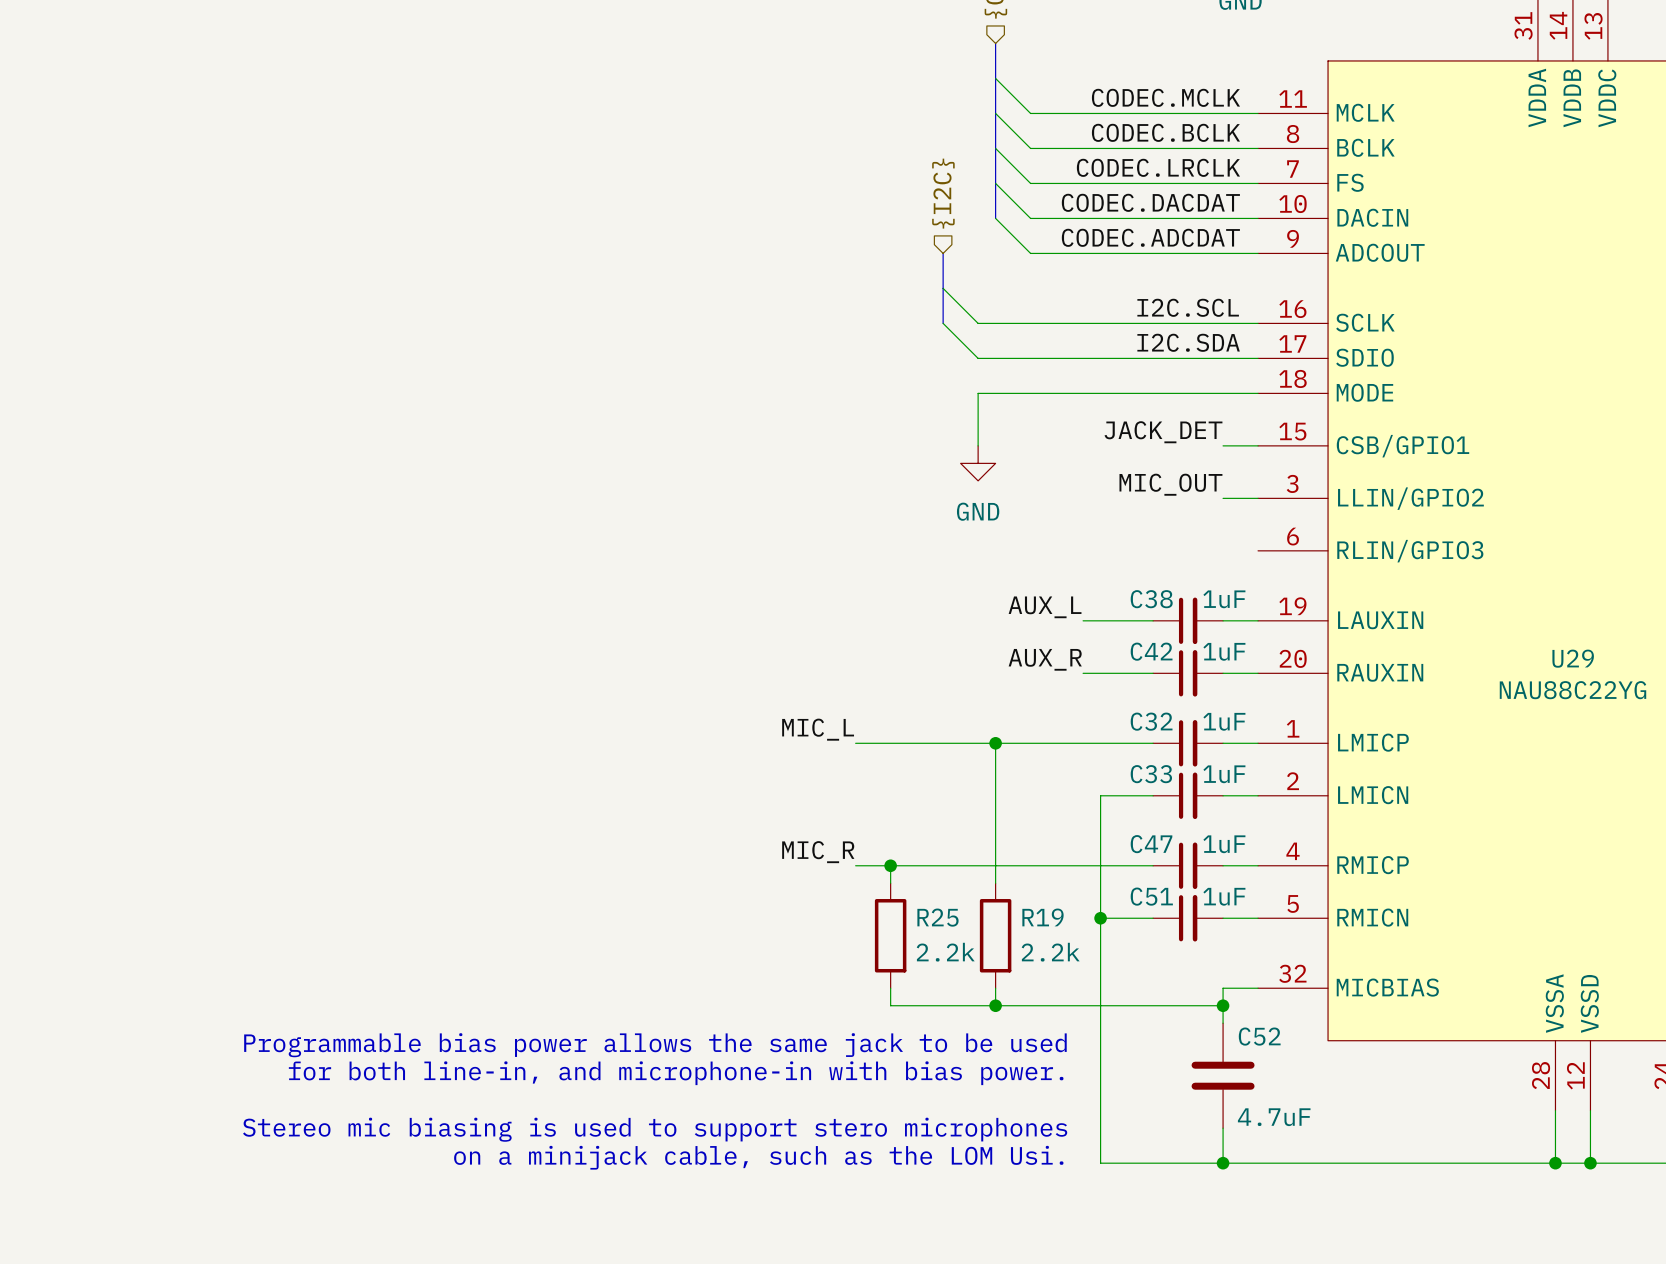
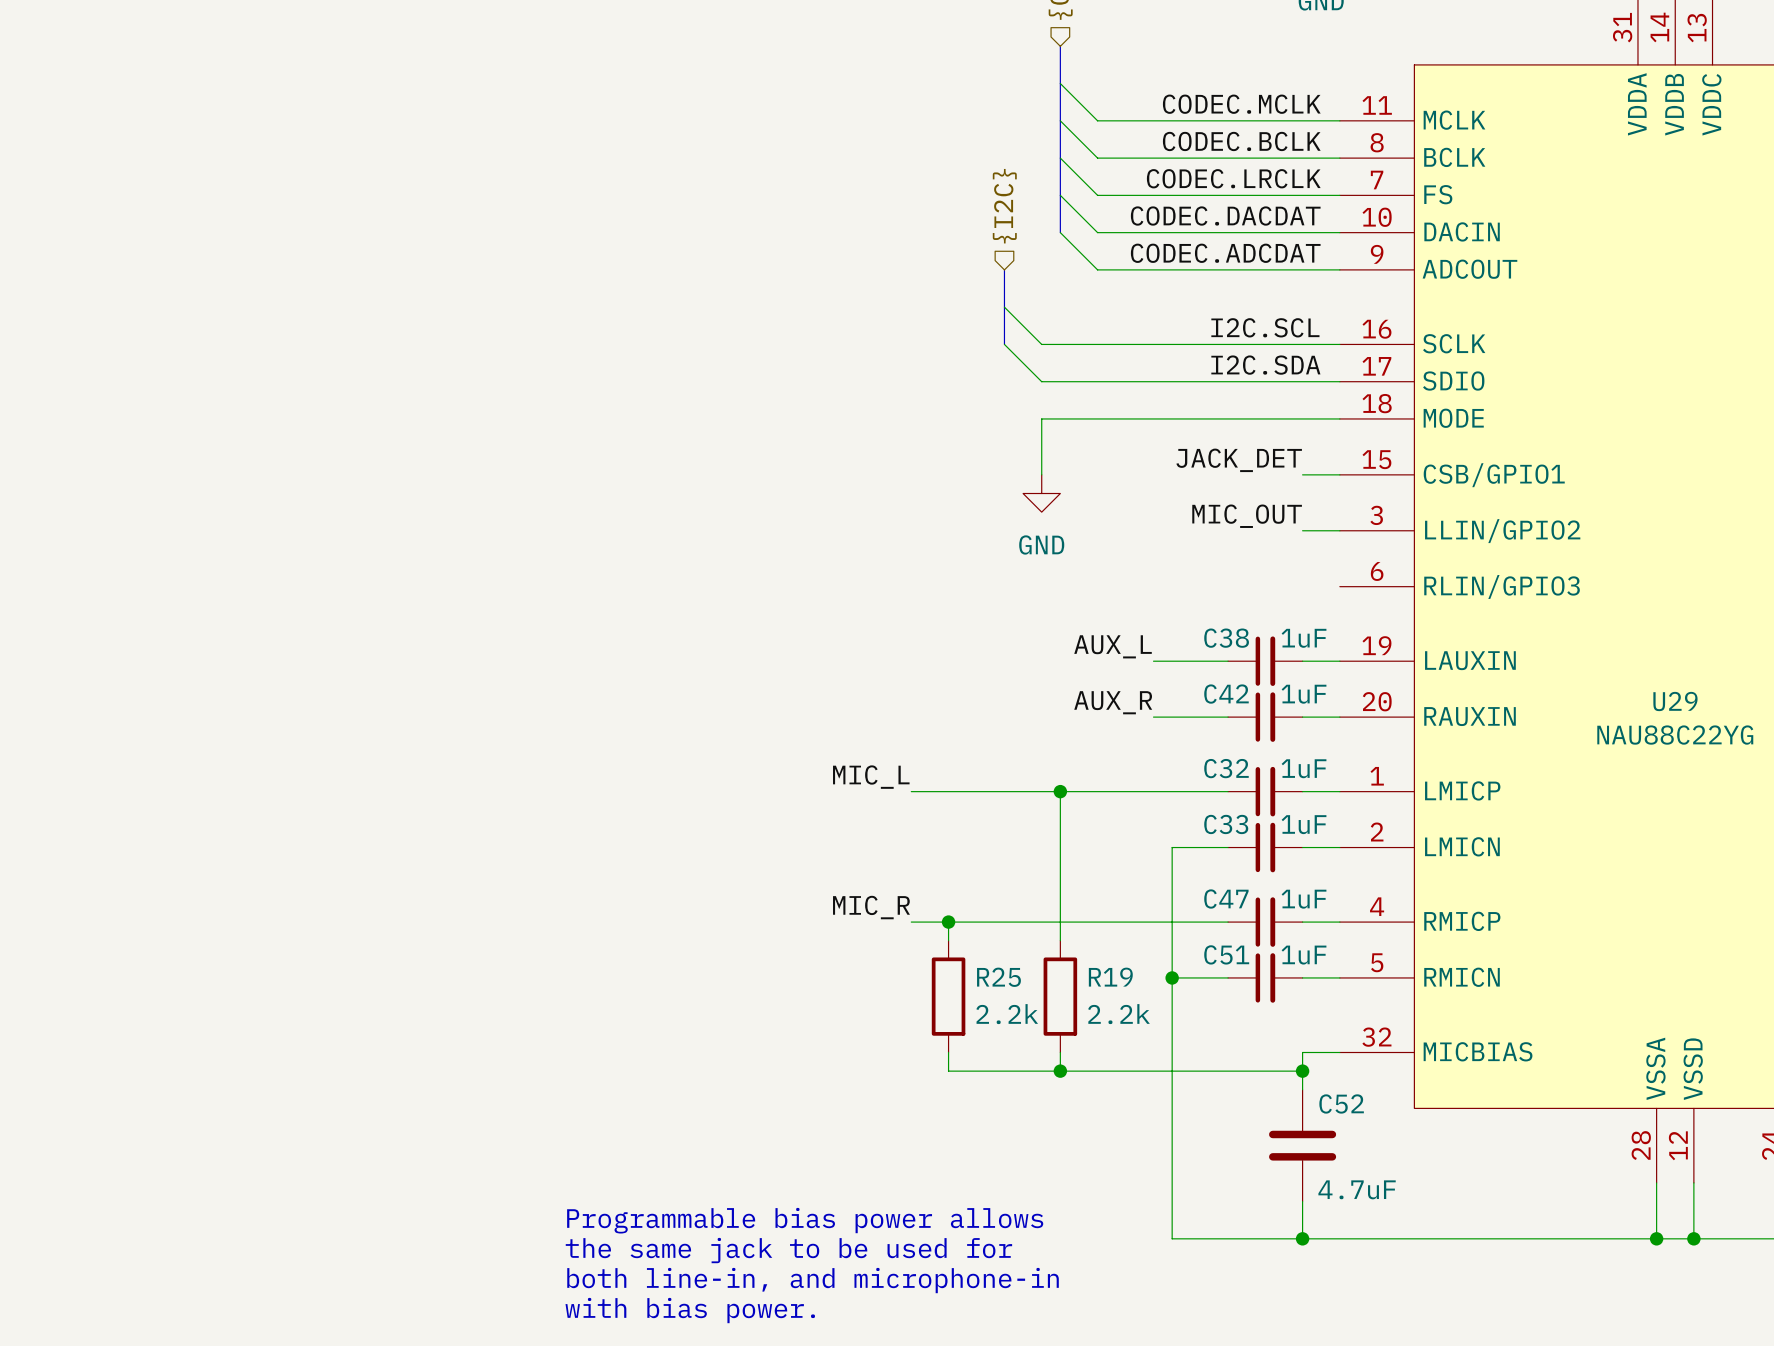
text: Programmable bias power allows the same jack to be used (655, 1045) -> none
text: for both line-in, and microphone-in with bias power. (676, 1073) -> none
text: Stereo mic biasing is used to support stero microphones (655, 1129) -> none
text: none -> Programmable bias power allows (805, 1220)
text: on a minijack cable, such as the LOM Usi. (758, 1157) -> none
text: none -> the same jack to be used for (788, 1250)
text: none -> both line-in, and microphone-in (813, 1280)
text: none -> with bias power. (690, 1310)

